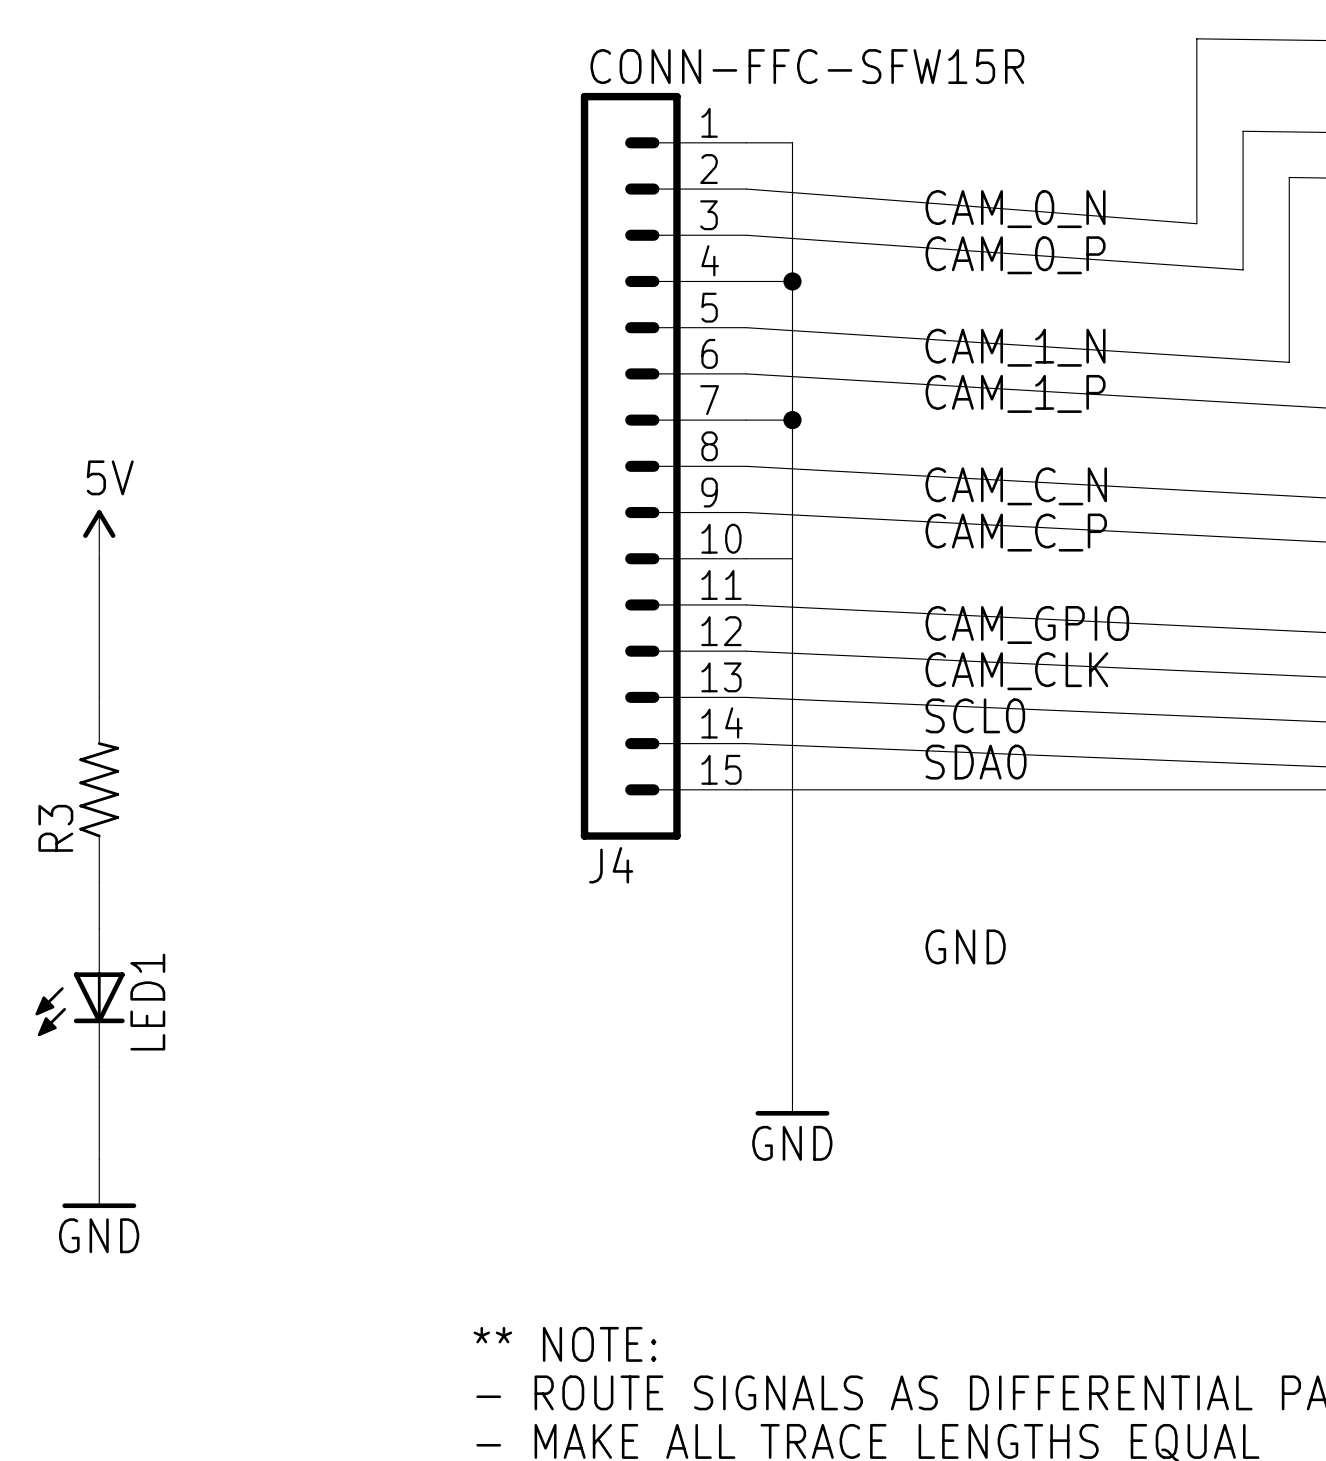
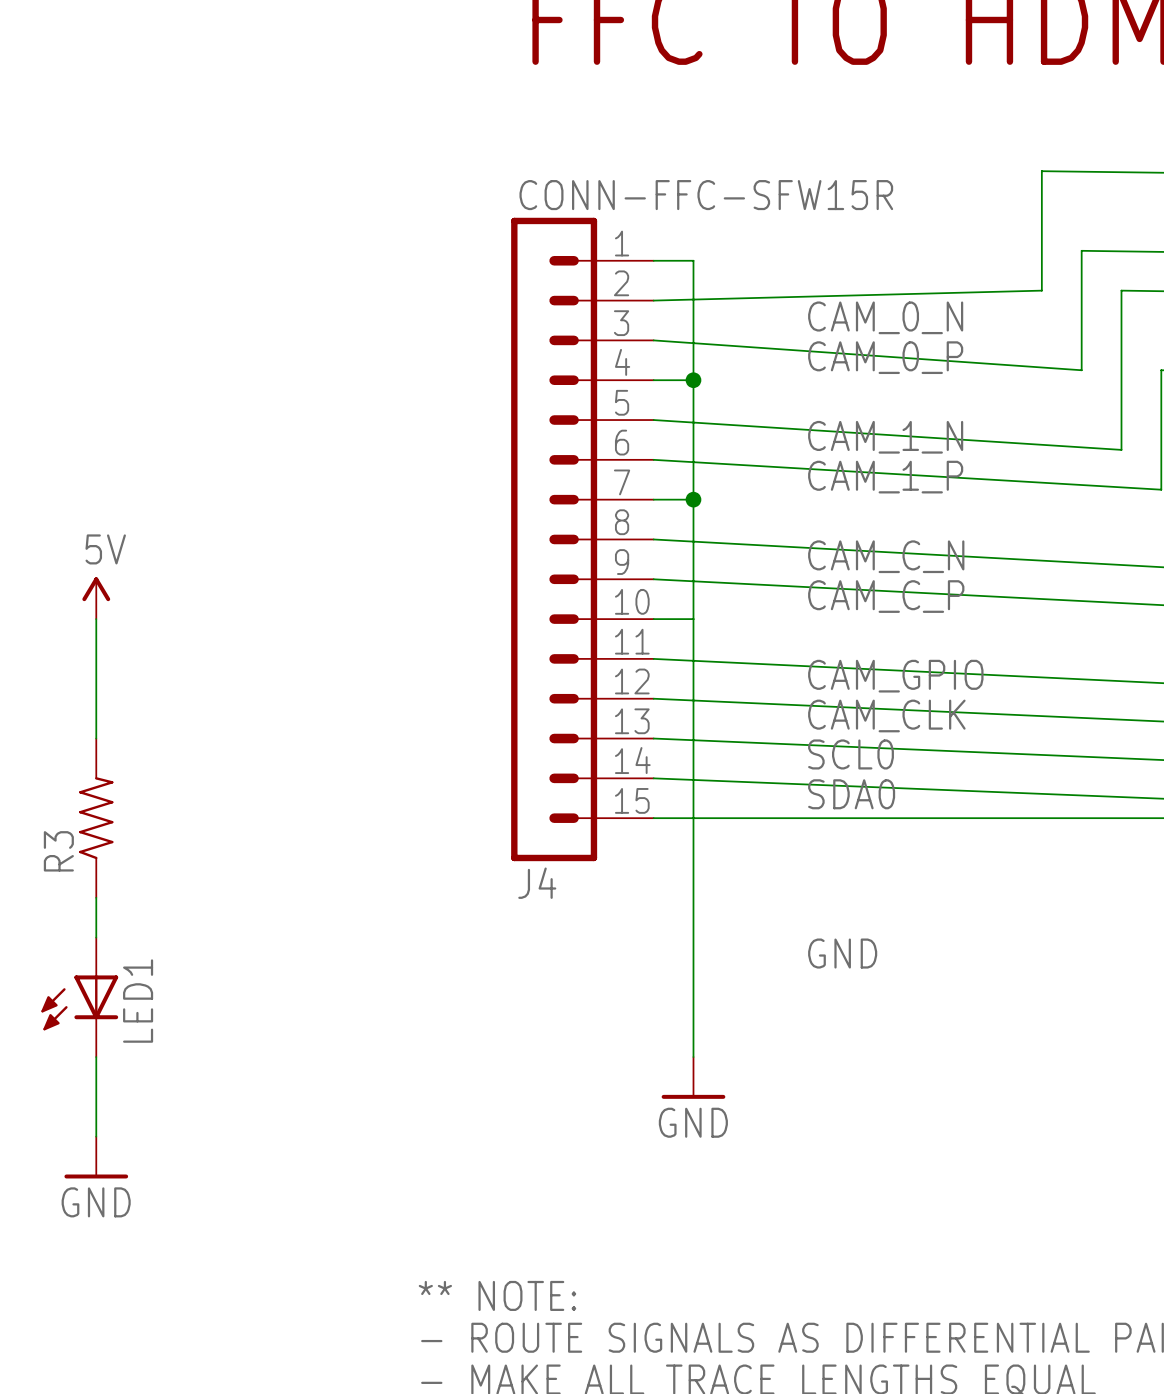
wire: (1196, 177) (1196, 223) (746, 189) -> (1041, 290) (653, 300)

